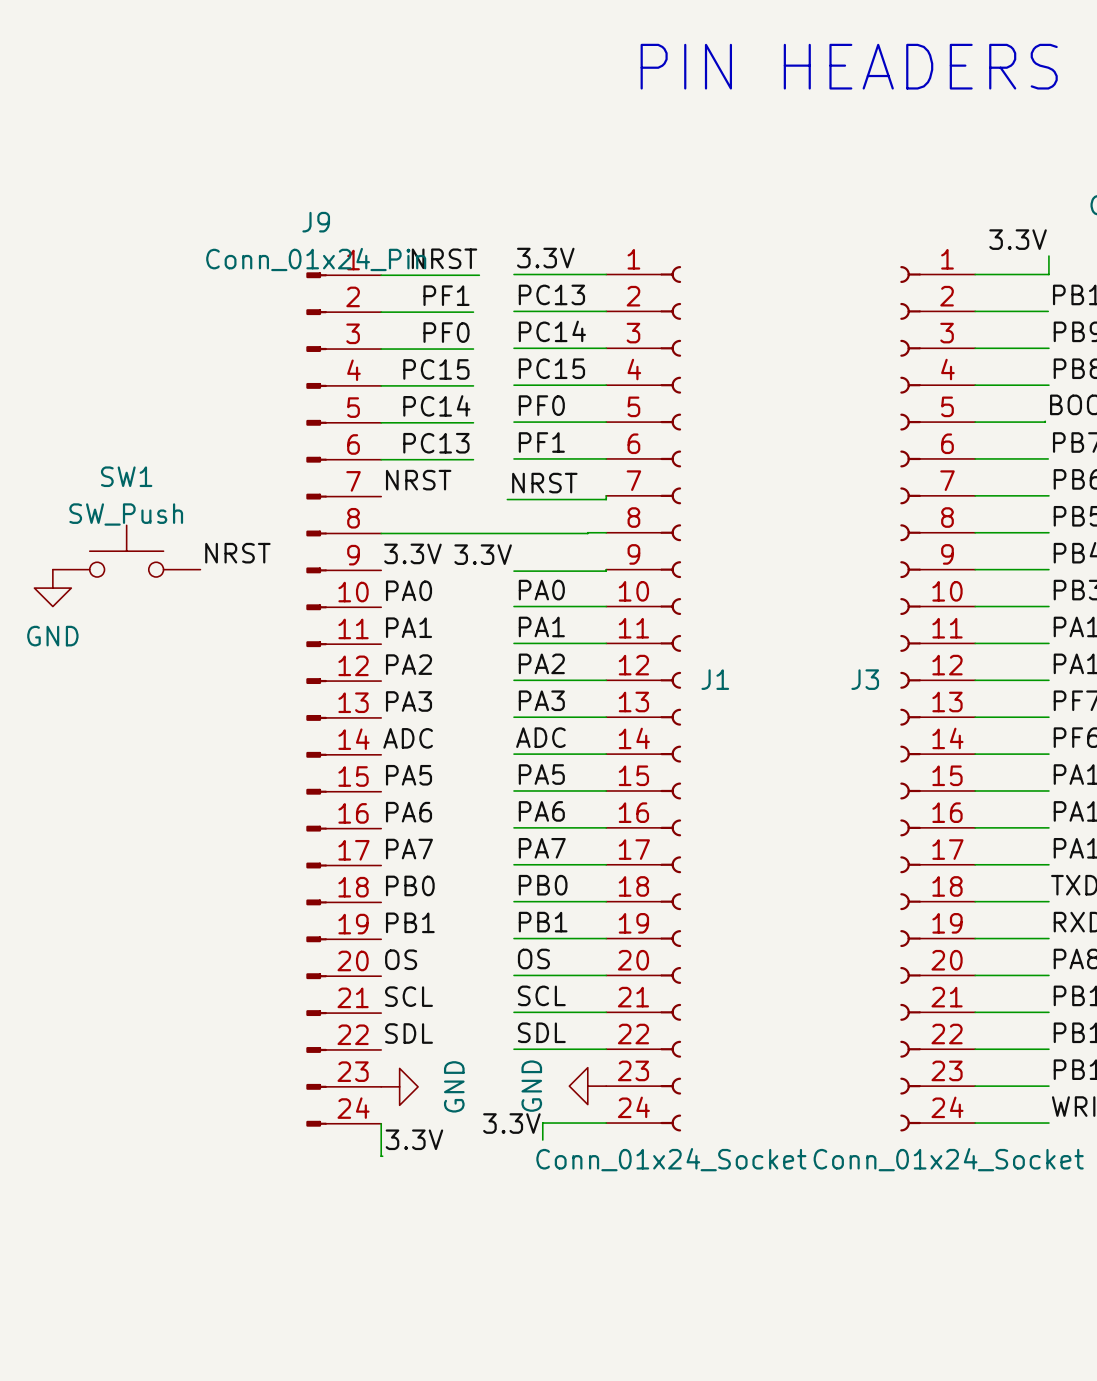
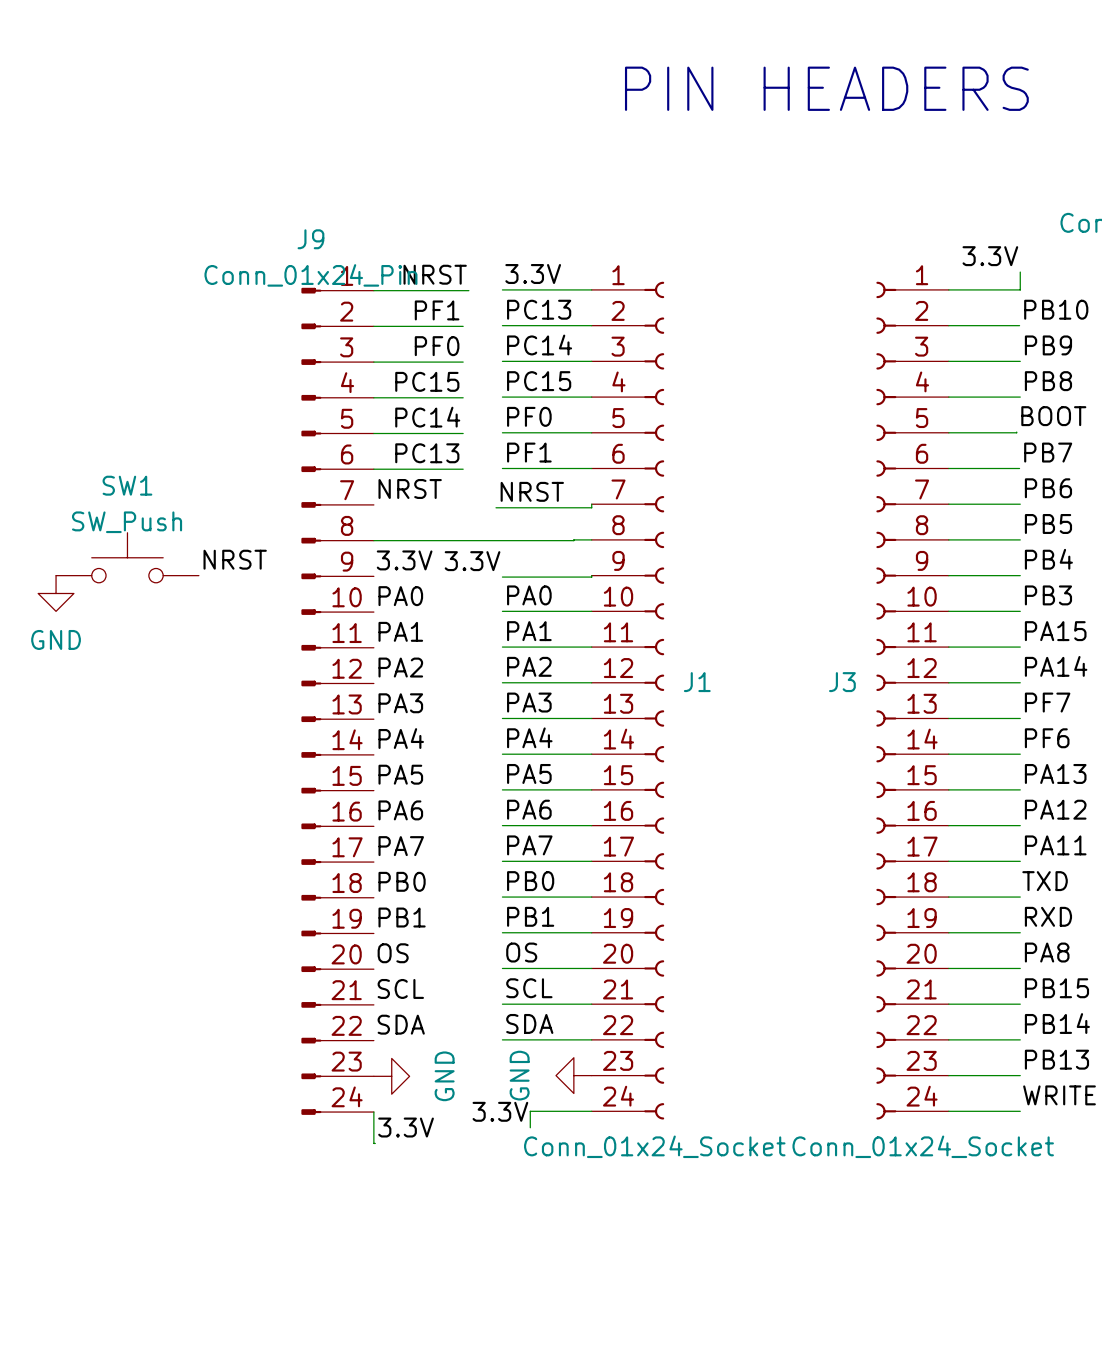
label: ADC (540, 737) -> PA4 (529, 737)
label: ADC (408, 738) -> PA4 (401, 738)
label: SDL (541, 1032) -> SDA (529, 1023)
label: SDL (409, 1033) -> SDA (401, 1024)

